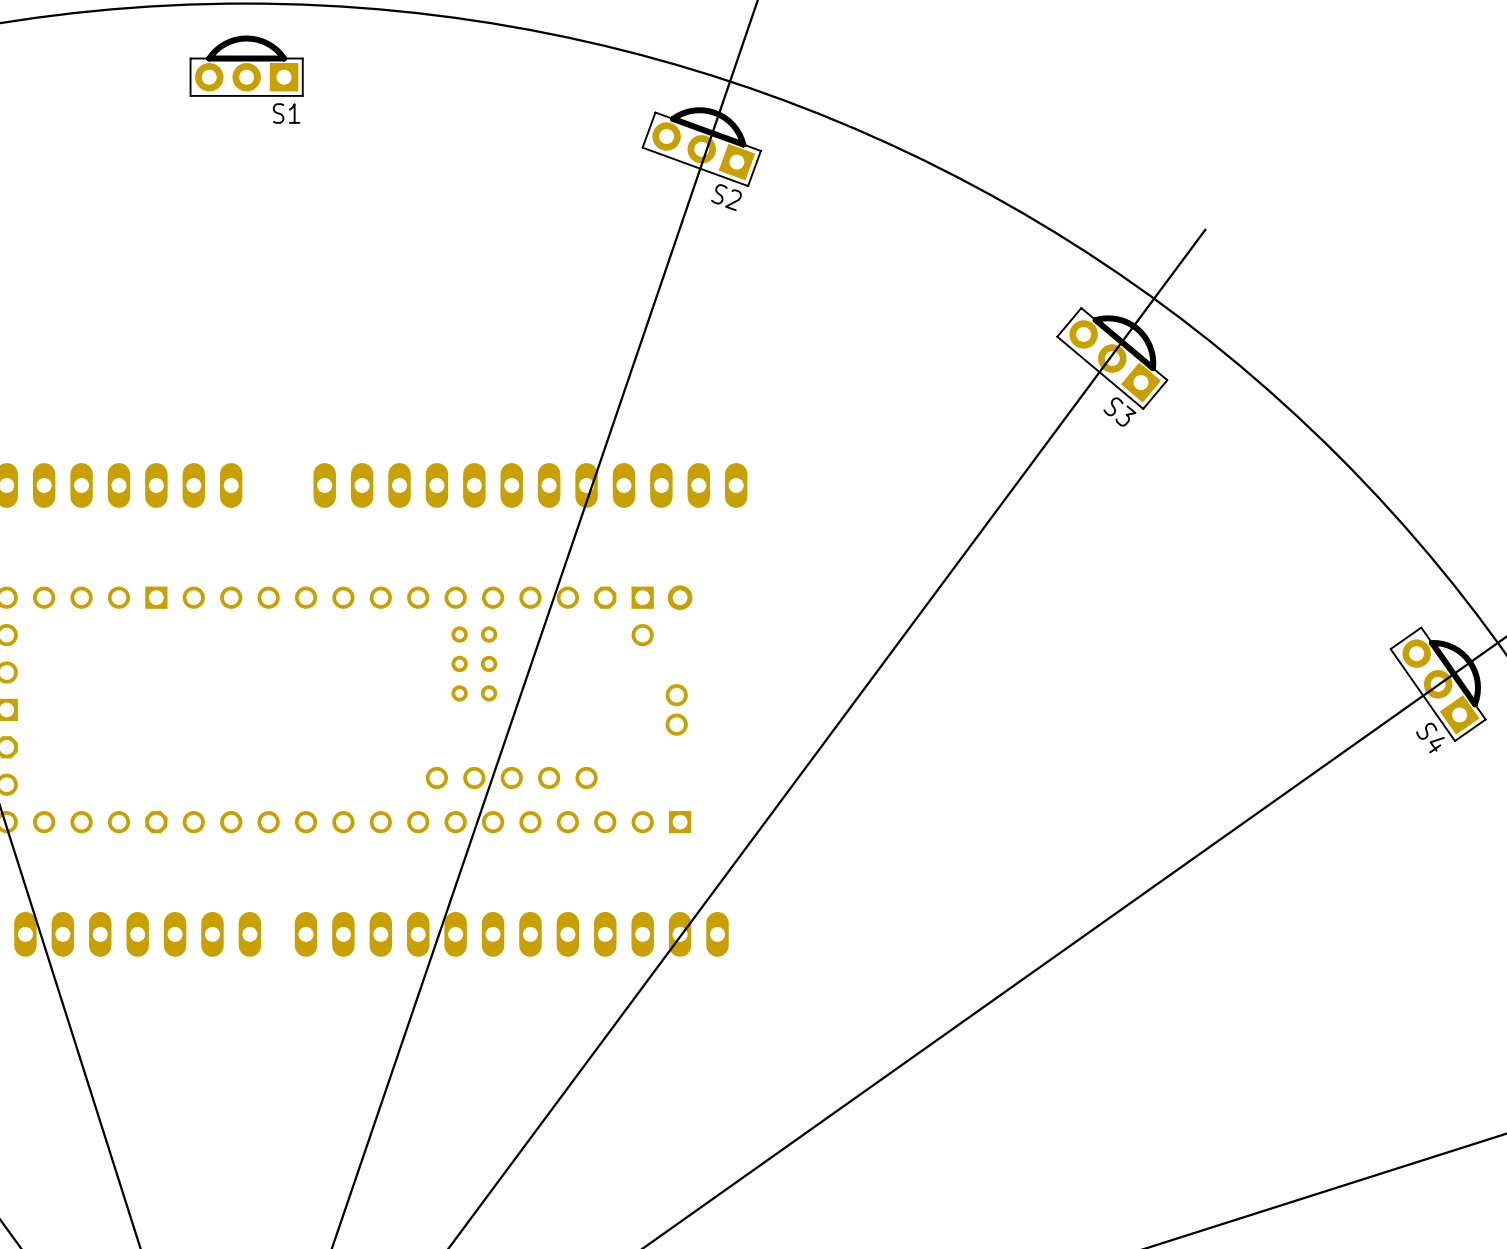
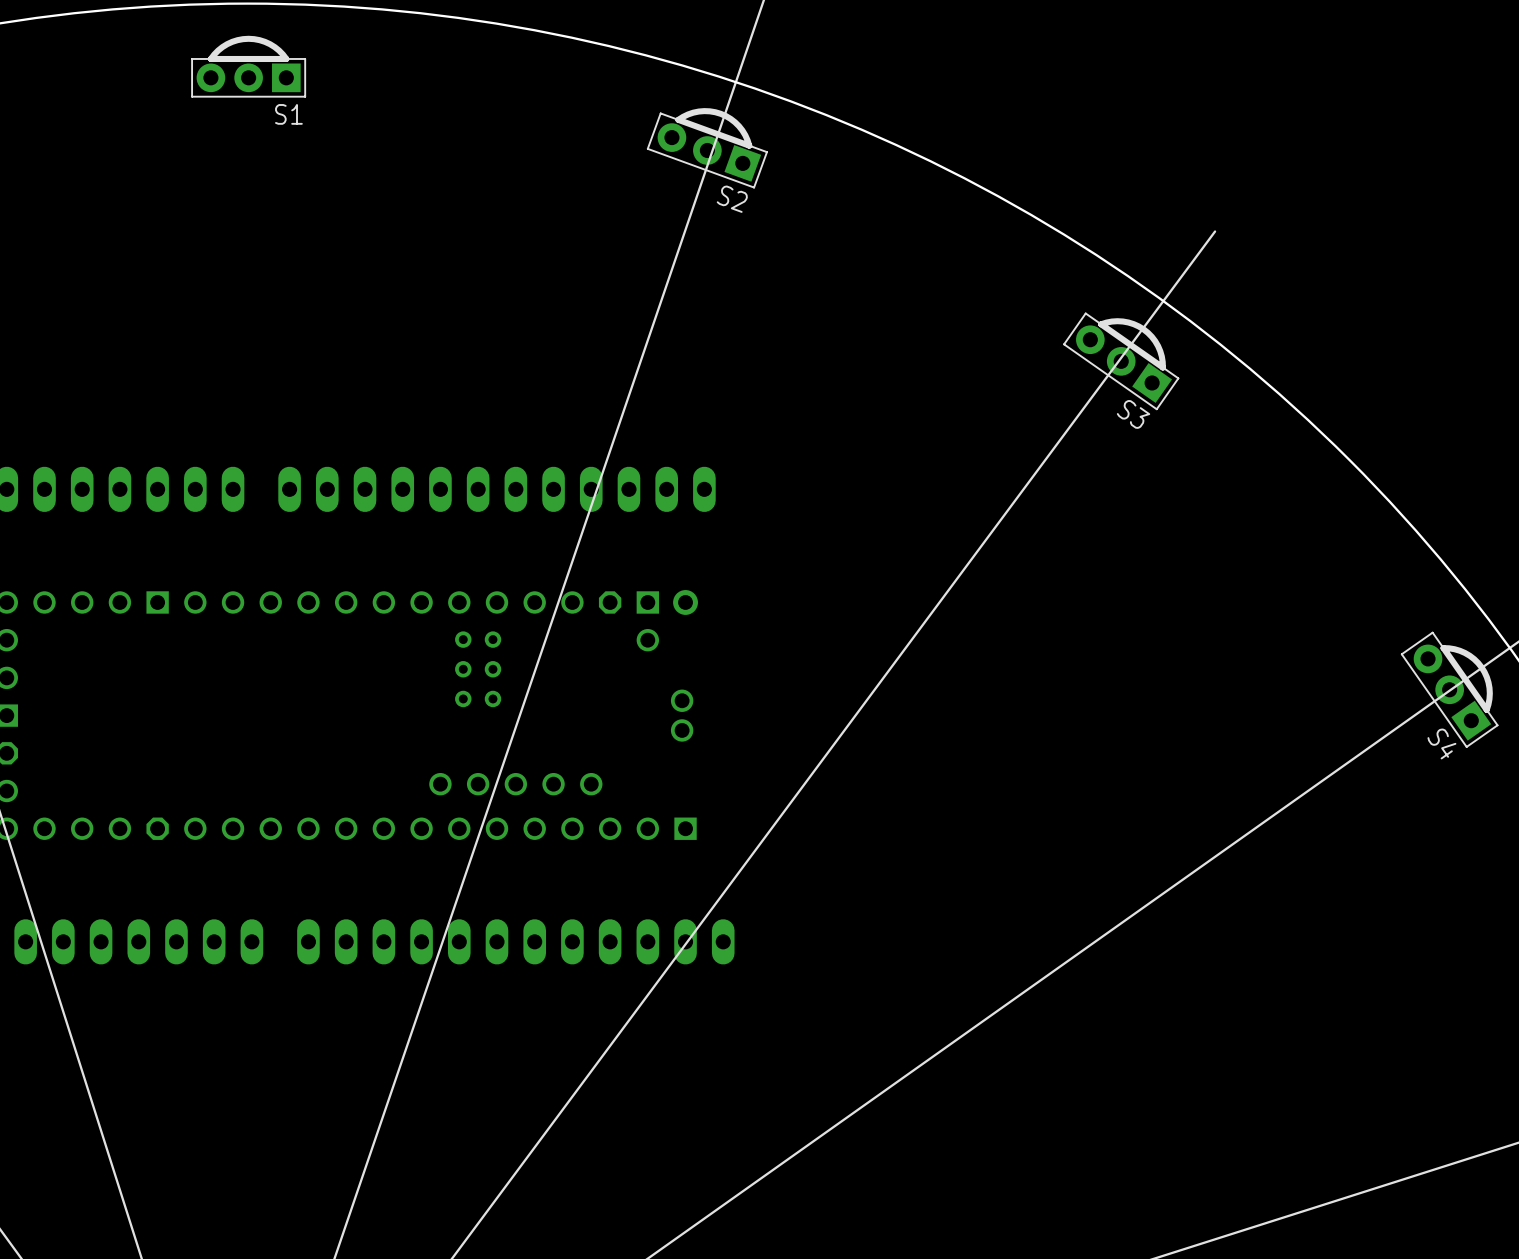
S3 rotation: 0° (1112, 358) -> 5° counterclockwise (1121, 361)
part position: (530, 485) -> (497, 489)

